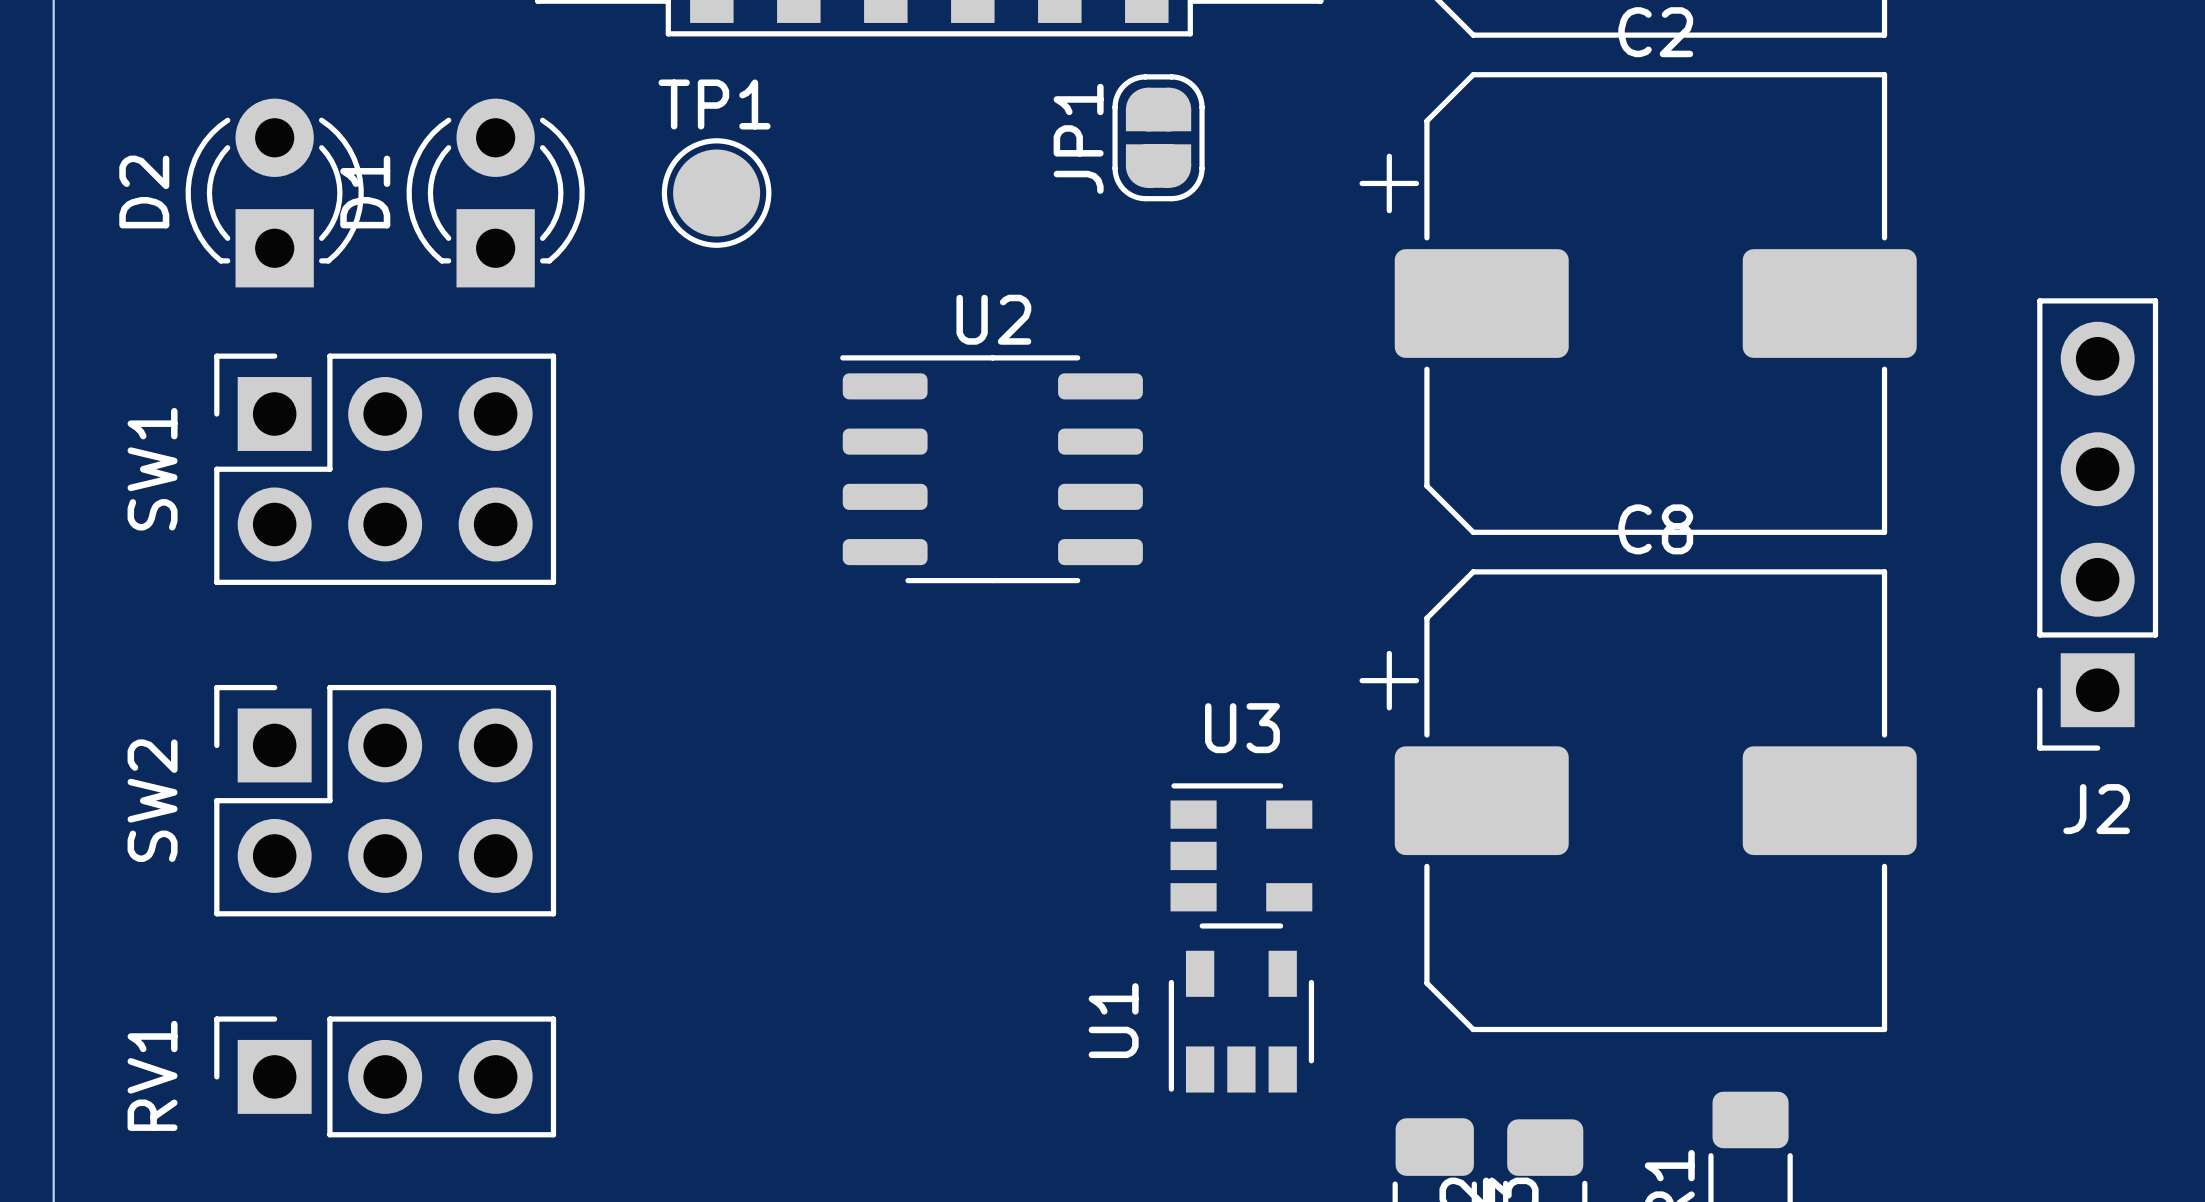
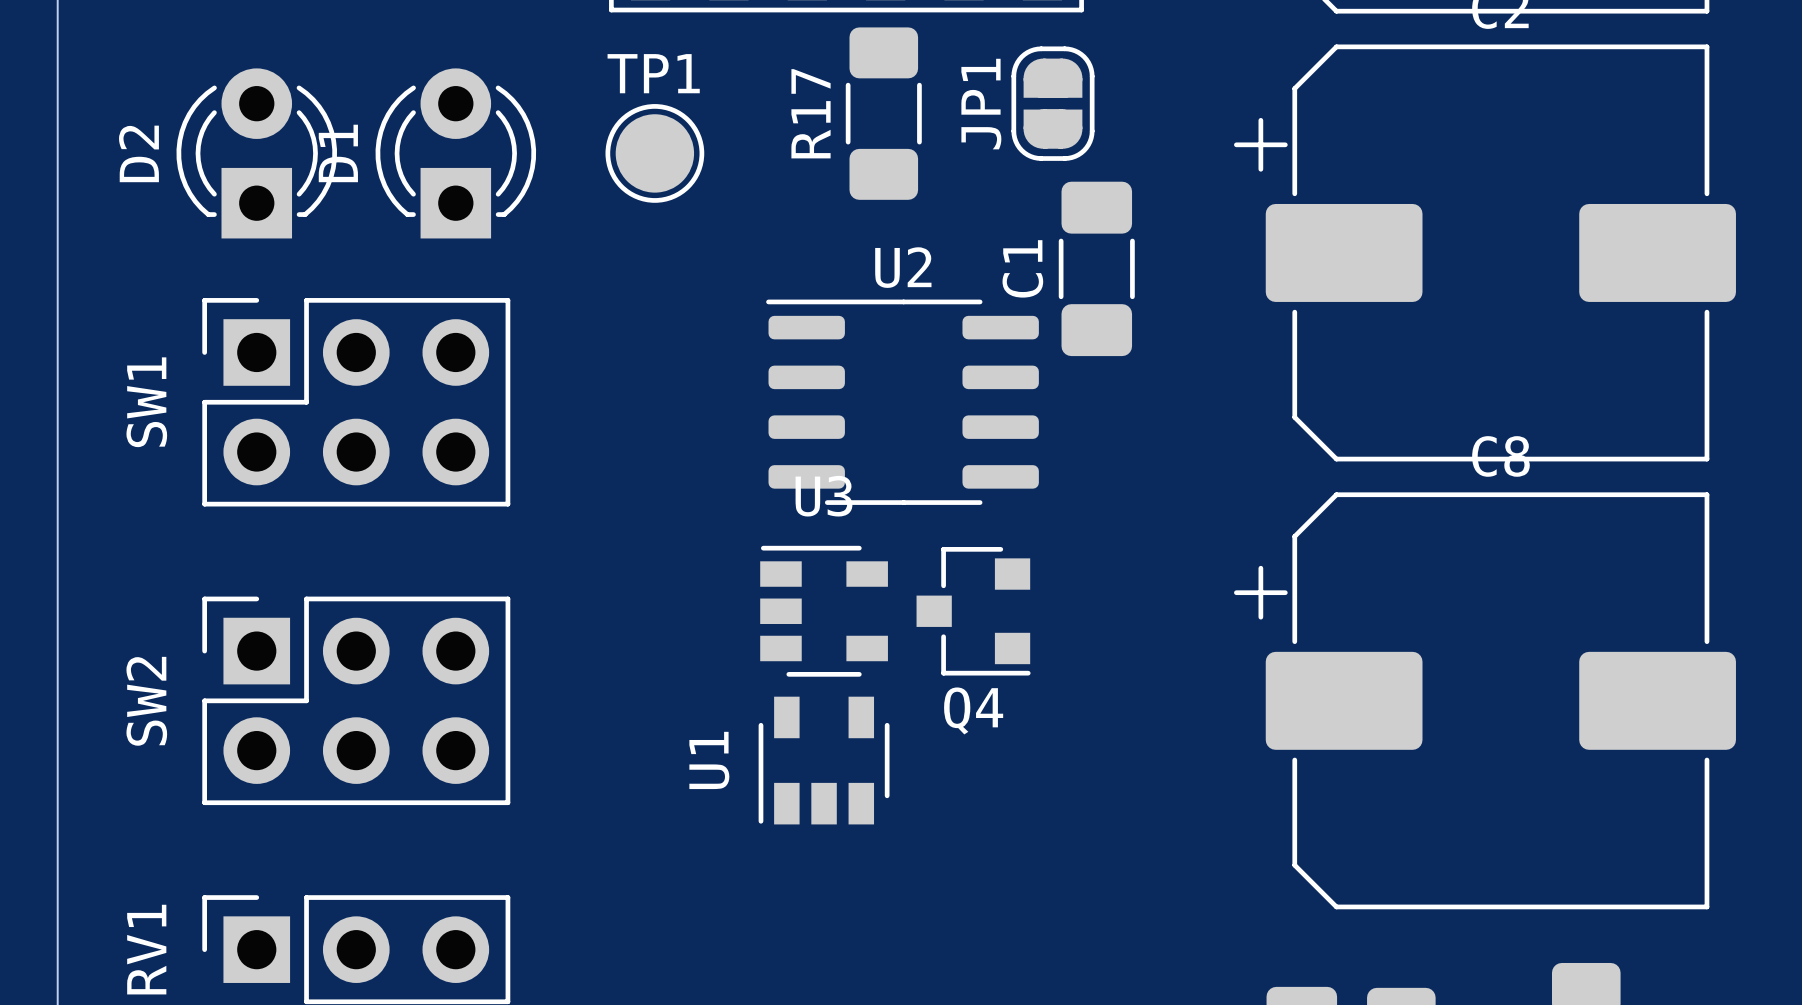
R17: none -> (883, 113)
C1: none -> (1096, 268)
Q4: none -> (973, 611)
U3 position: (1241, 855) -> (824, 611)
U1 position: (1241, 1021) -> (824, 760)

